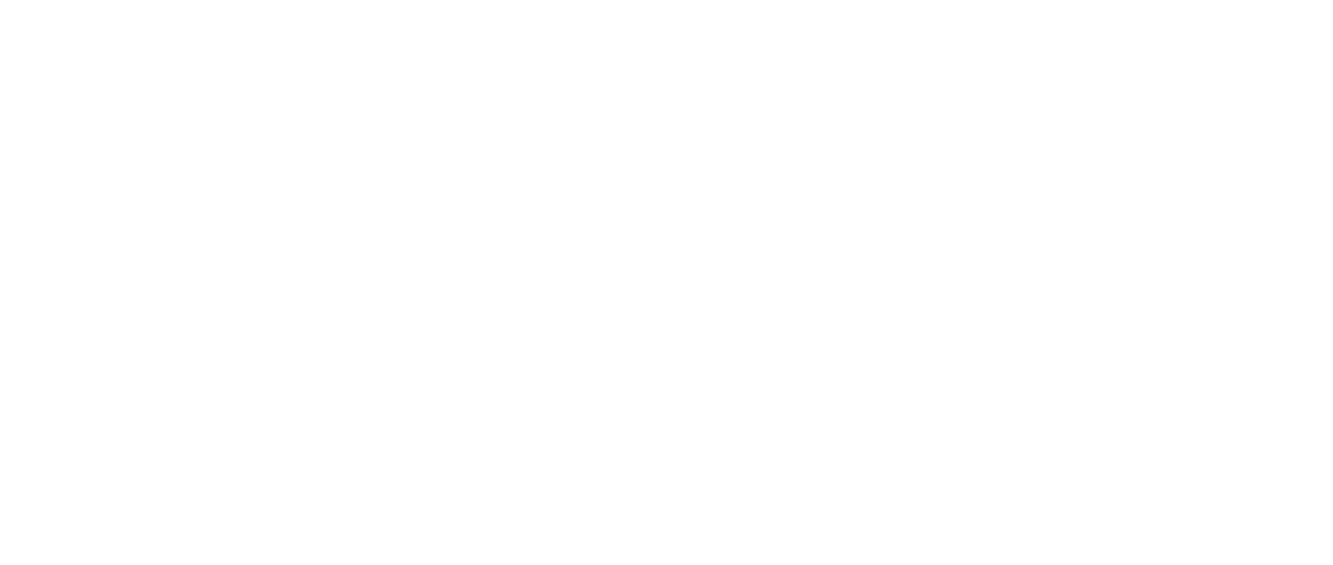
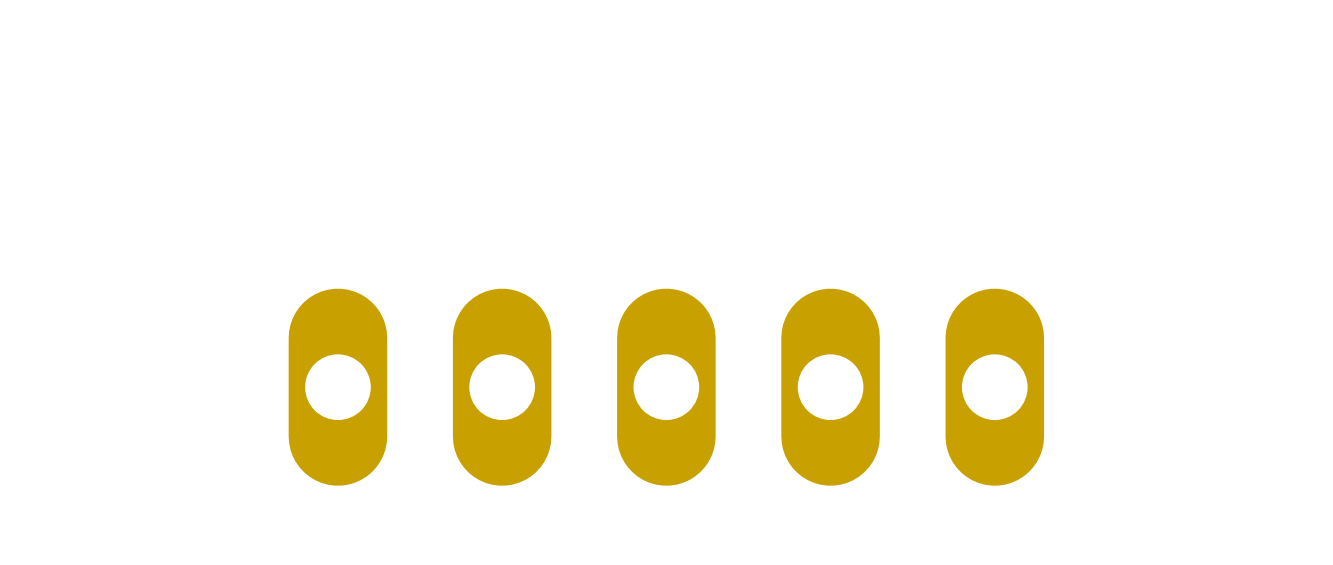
part: none -> (666, 387)

